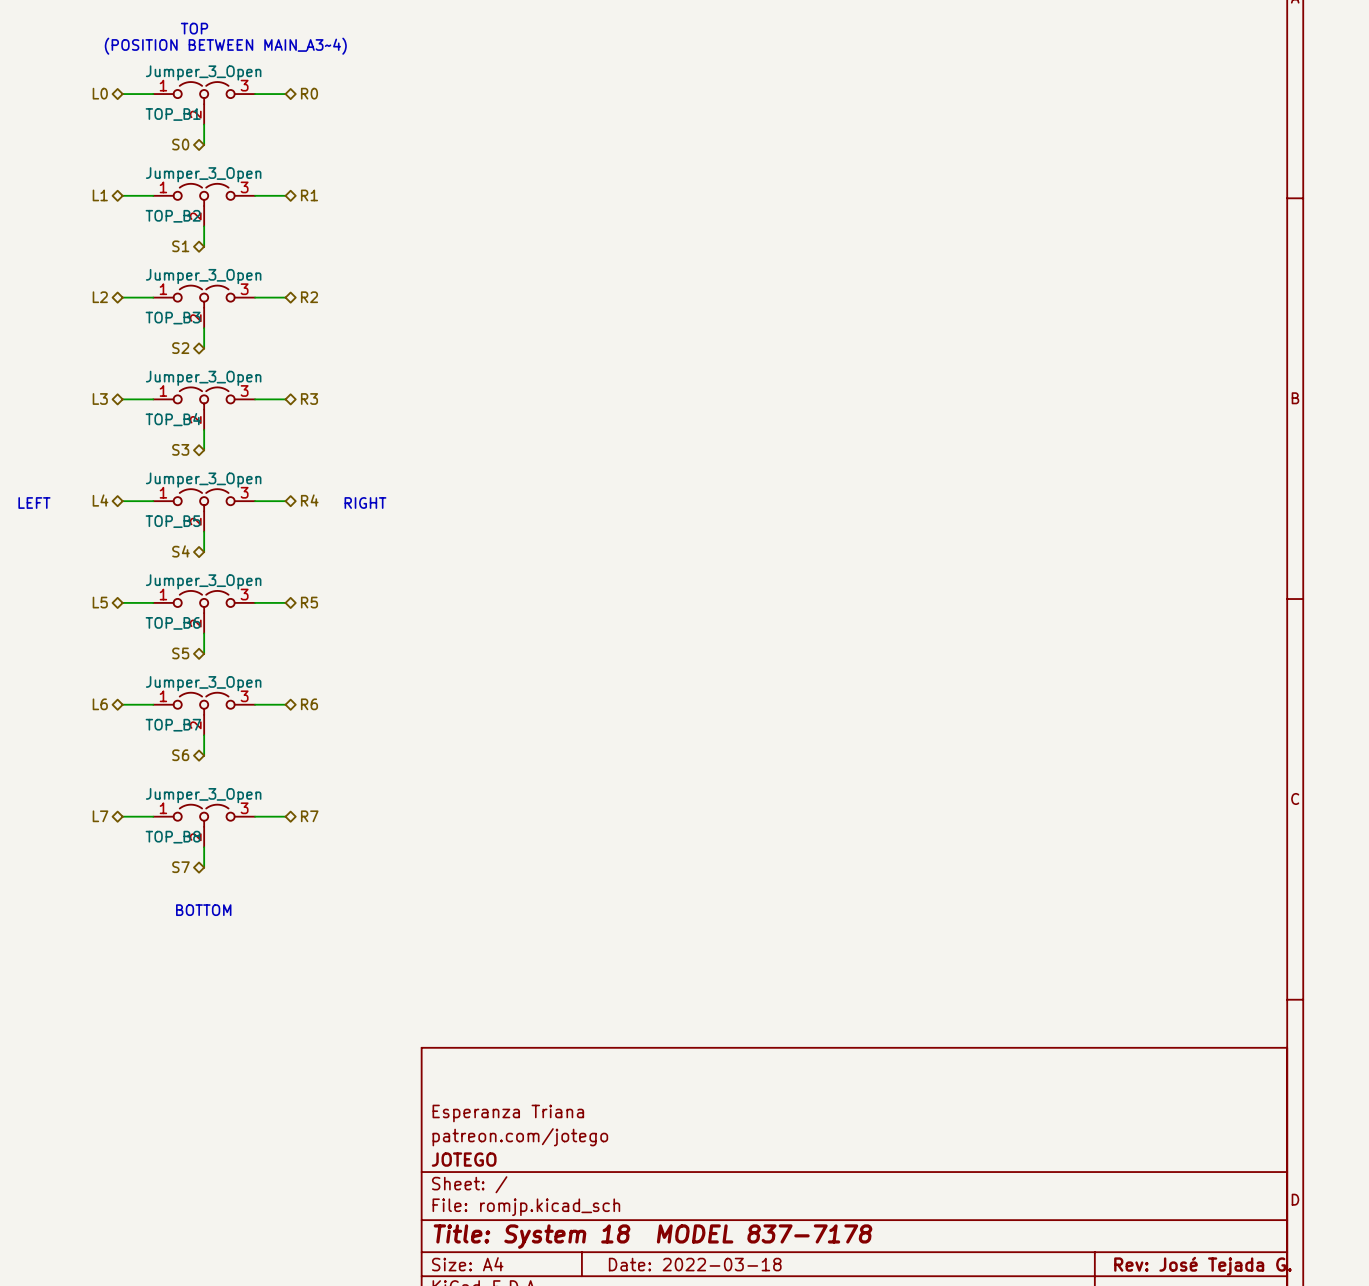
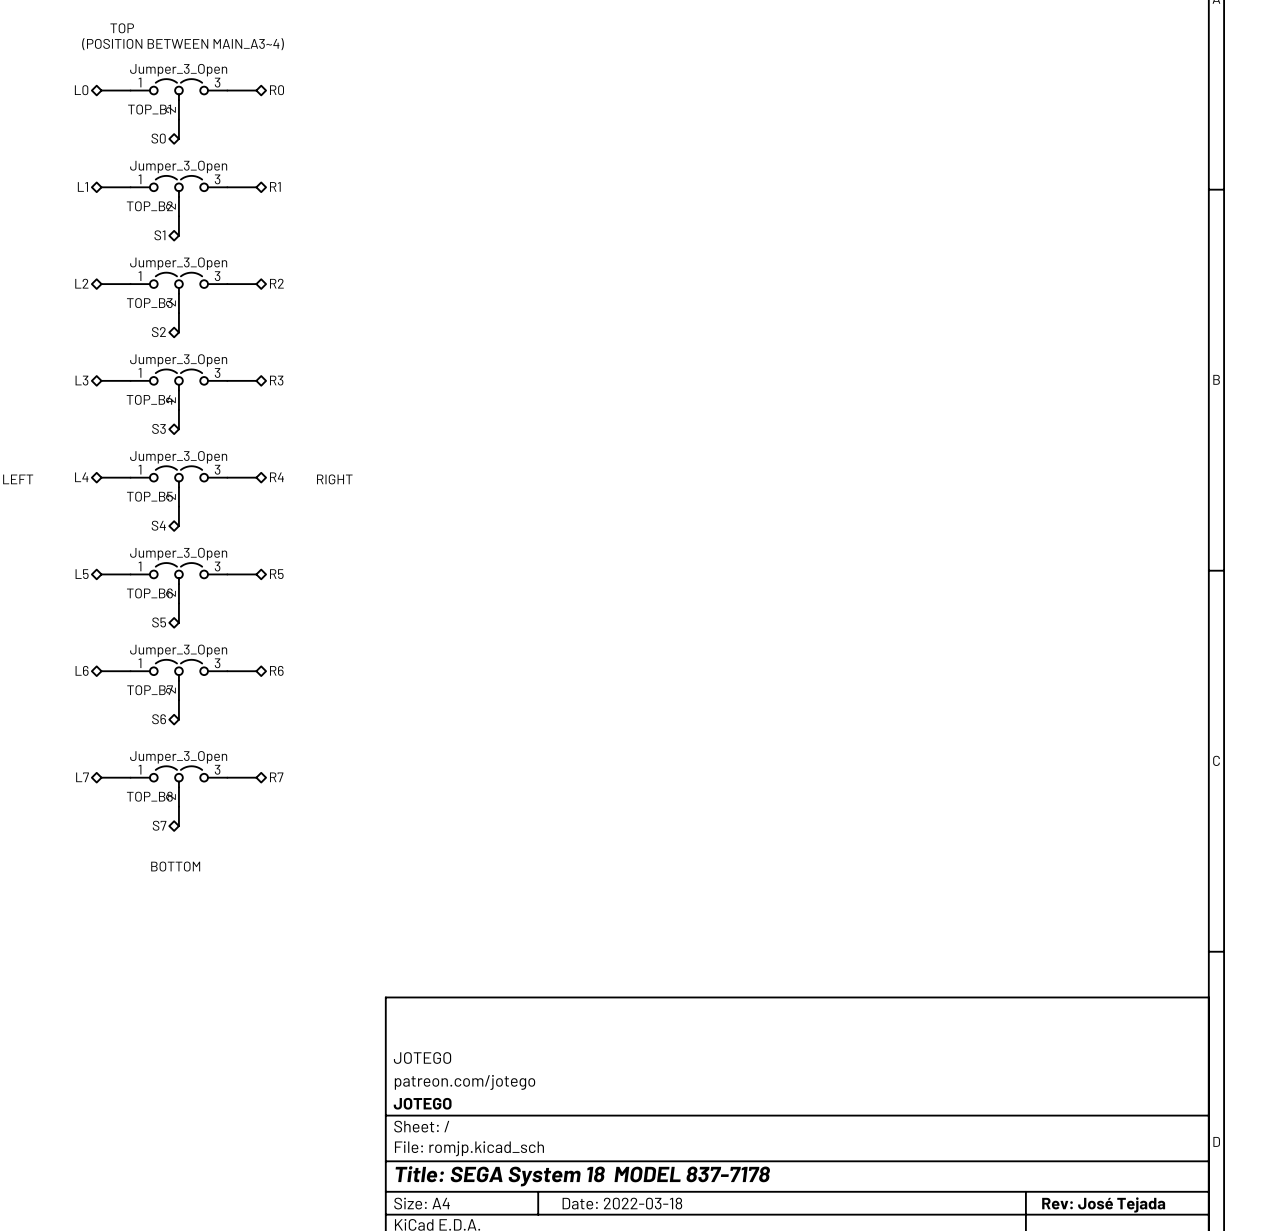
title block: Esperanza Triana (508, 1113) -> JOTEGO (422, 1058)
title block: Title: System 18 MODEL 837-7178 (653, 1236) -> Title: SEGA System 18 MODEL 837-7178 (582, 1176)
title block: Rev: José Tejada G. (1202, 1266) -> Rev: José Tejada (1103, 1205)

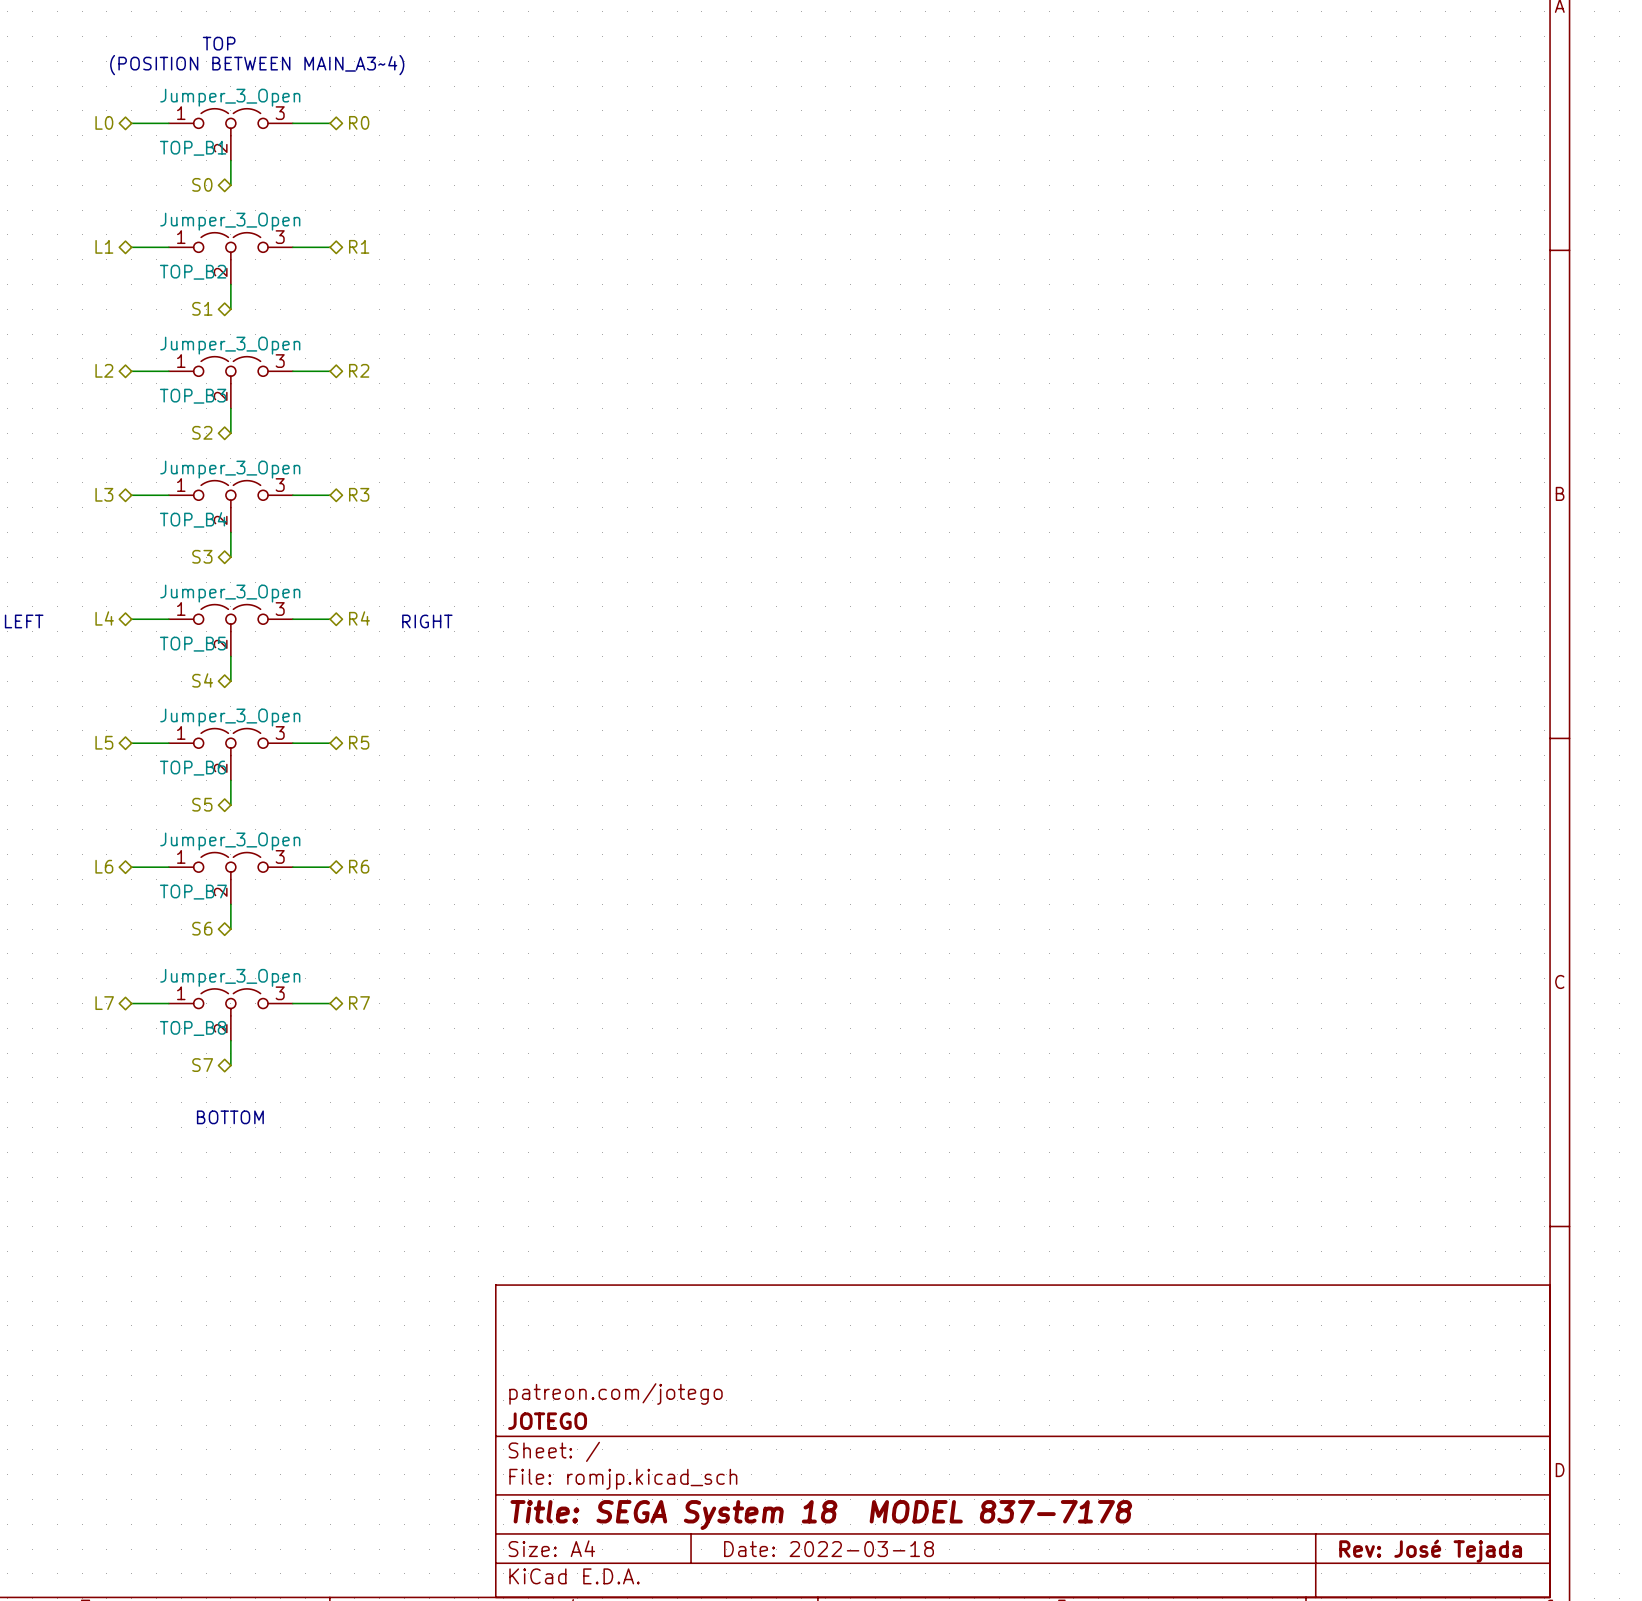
title block: JOTEGO (422, 1058) -> none

